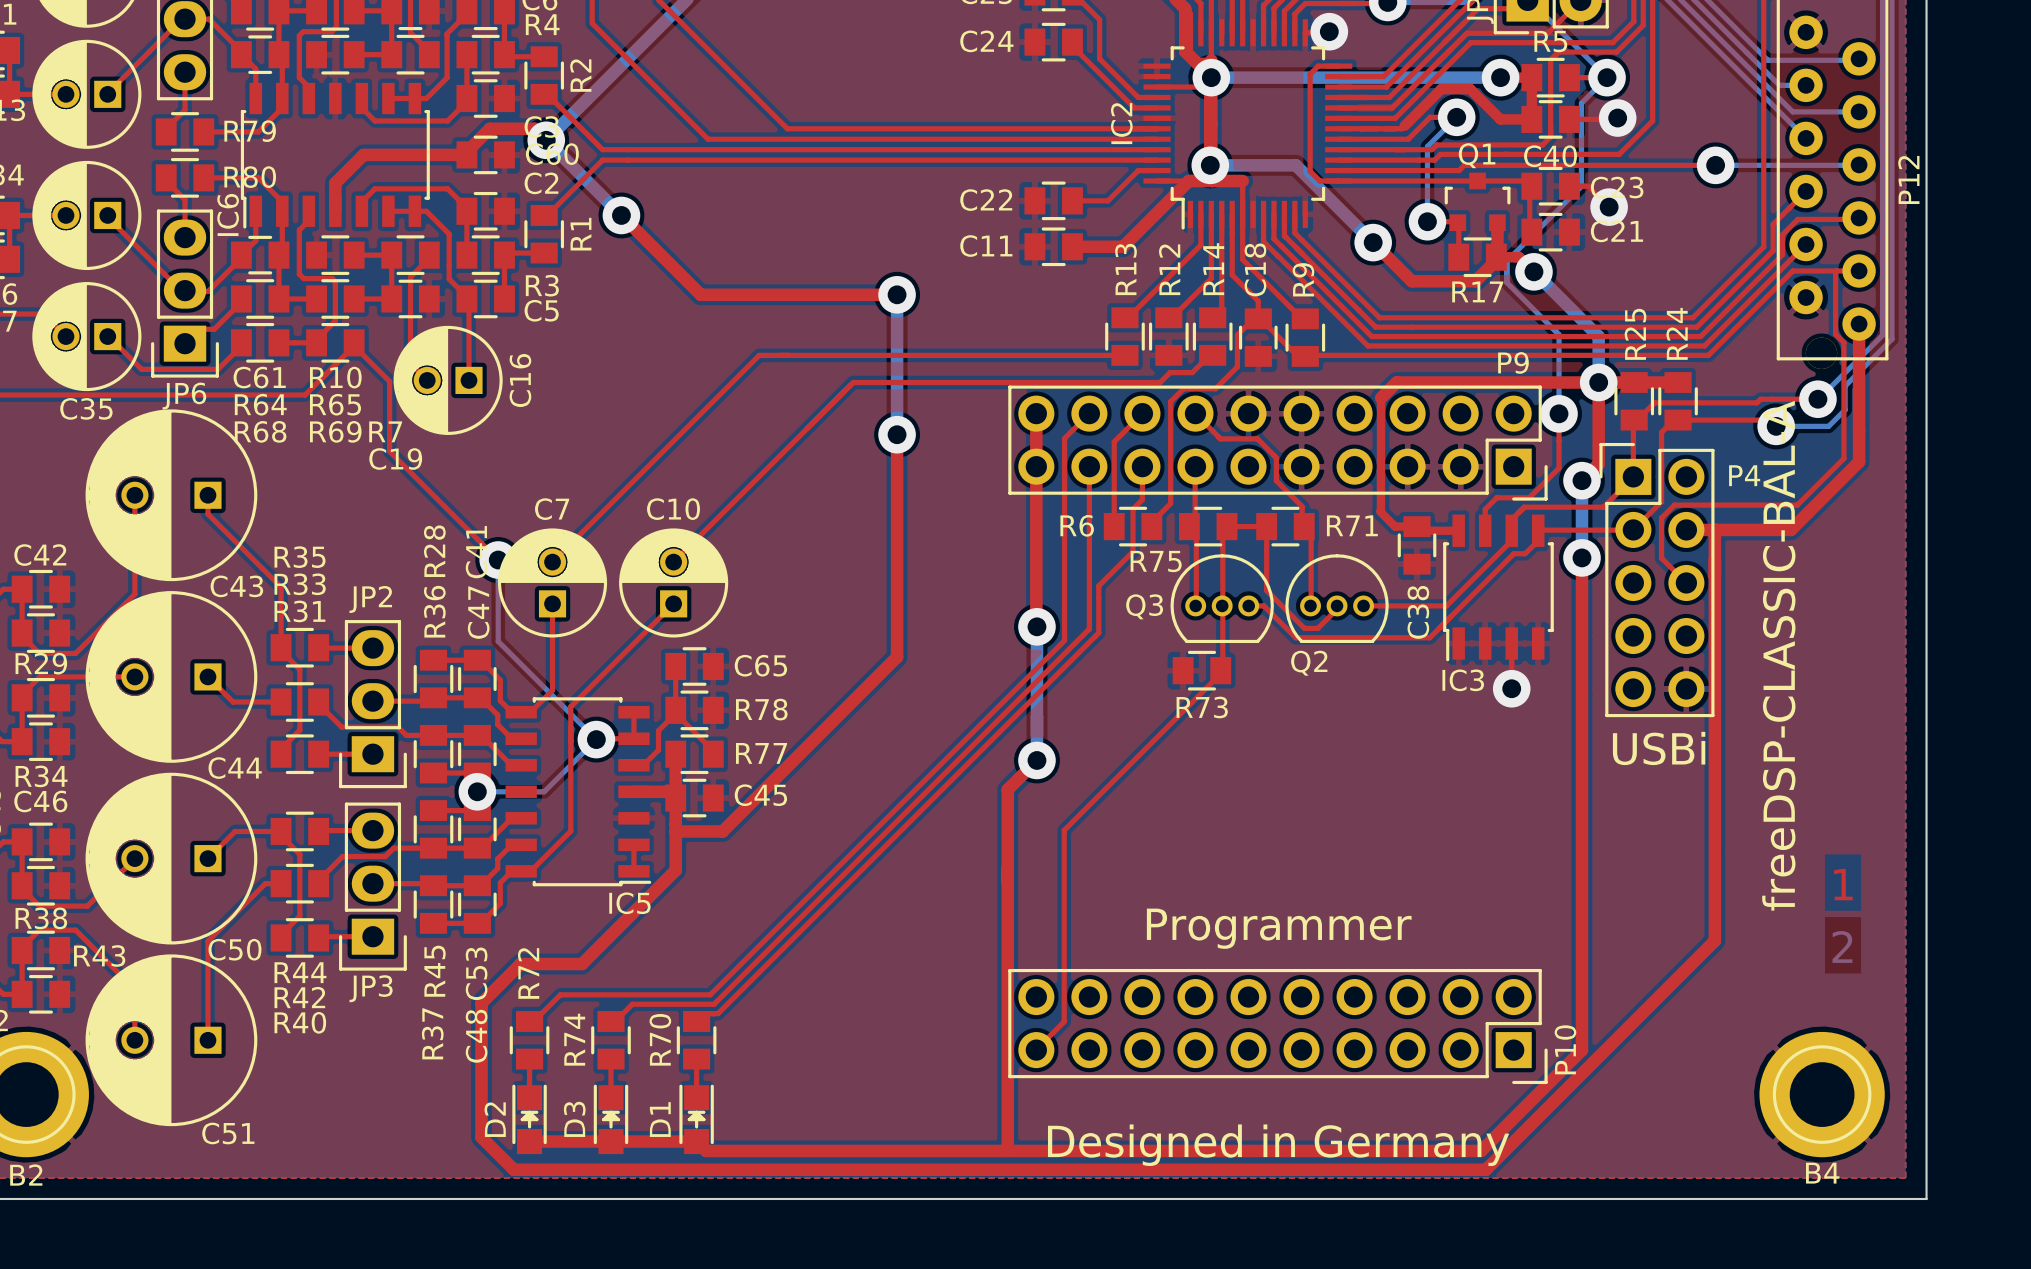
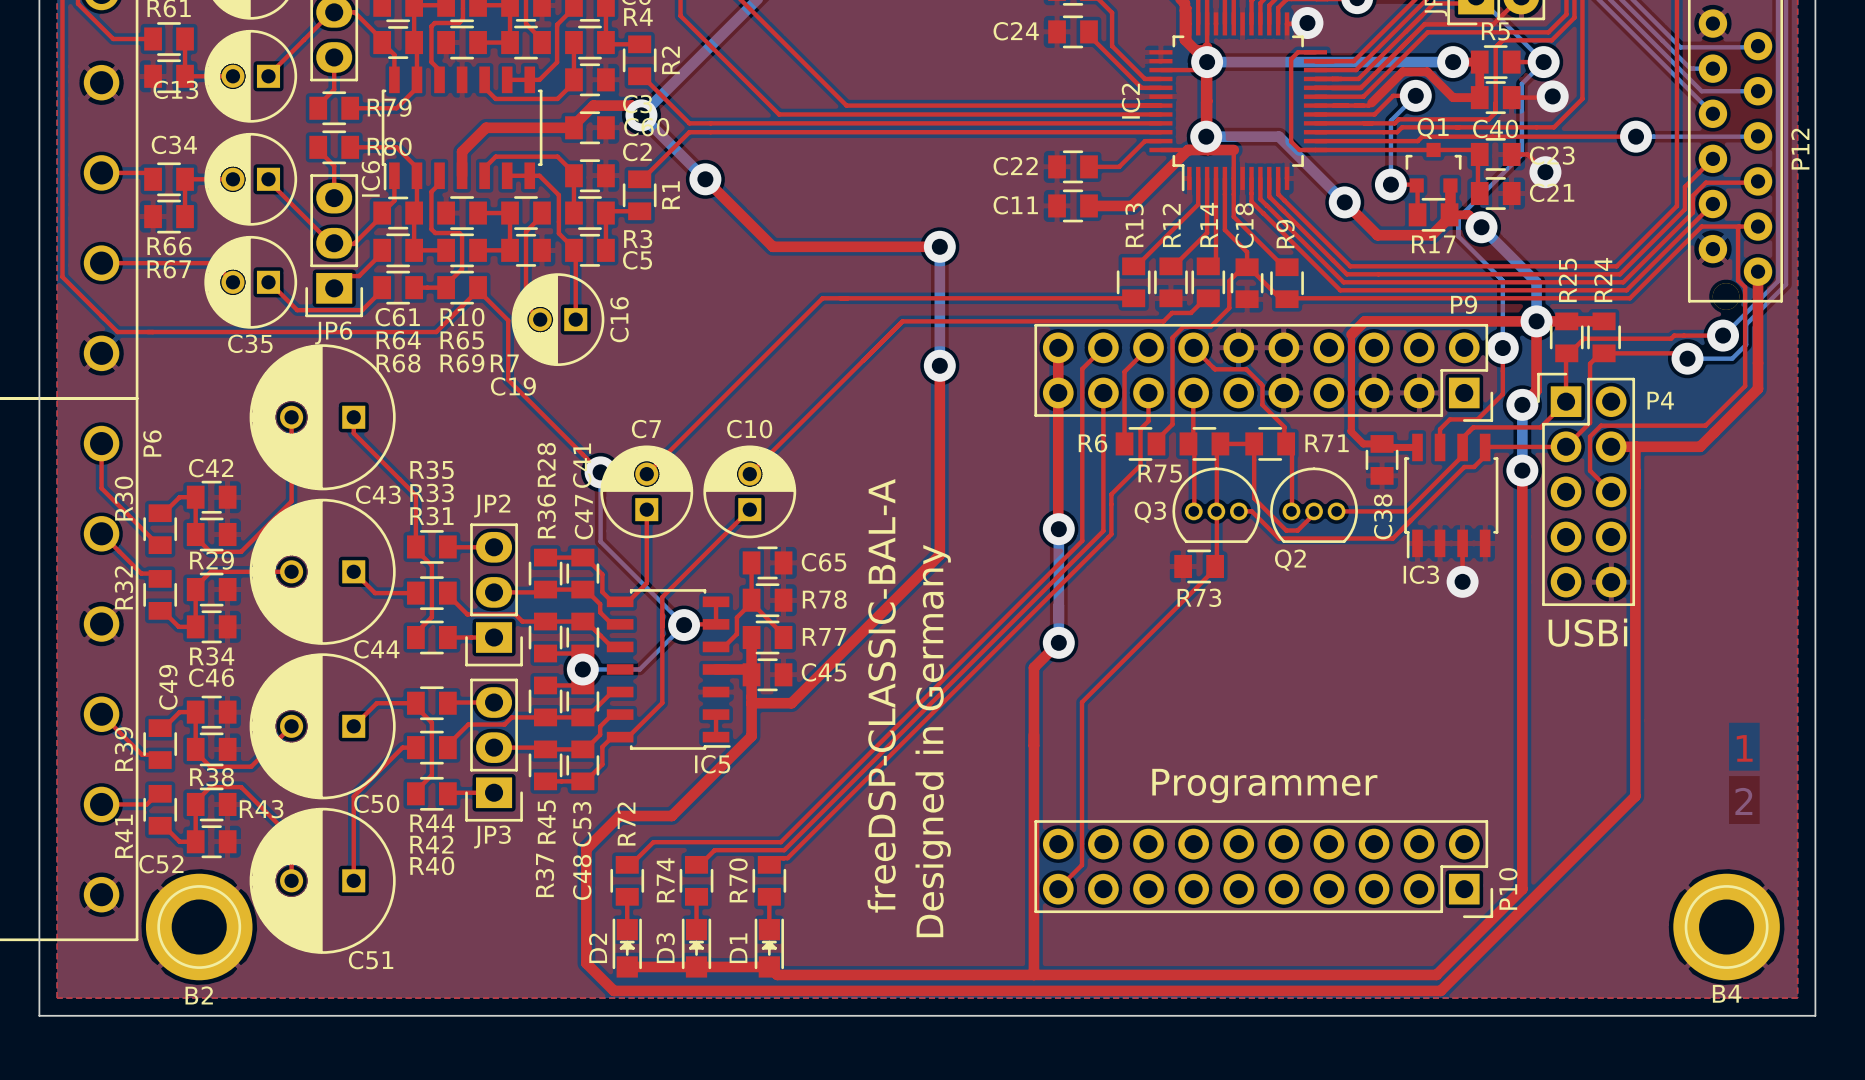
text: freeDSP-CLASSIC-BAL-A (1778, 655) -> none
text: none -> freeDSP-CLASSIC-BAL-A (881, 695)
text rotation: 0° (1278, 1145) -> 90° counterclockwise (933, 741)

